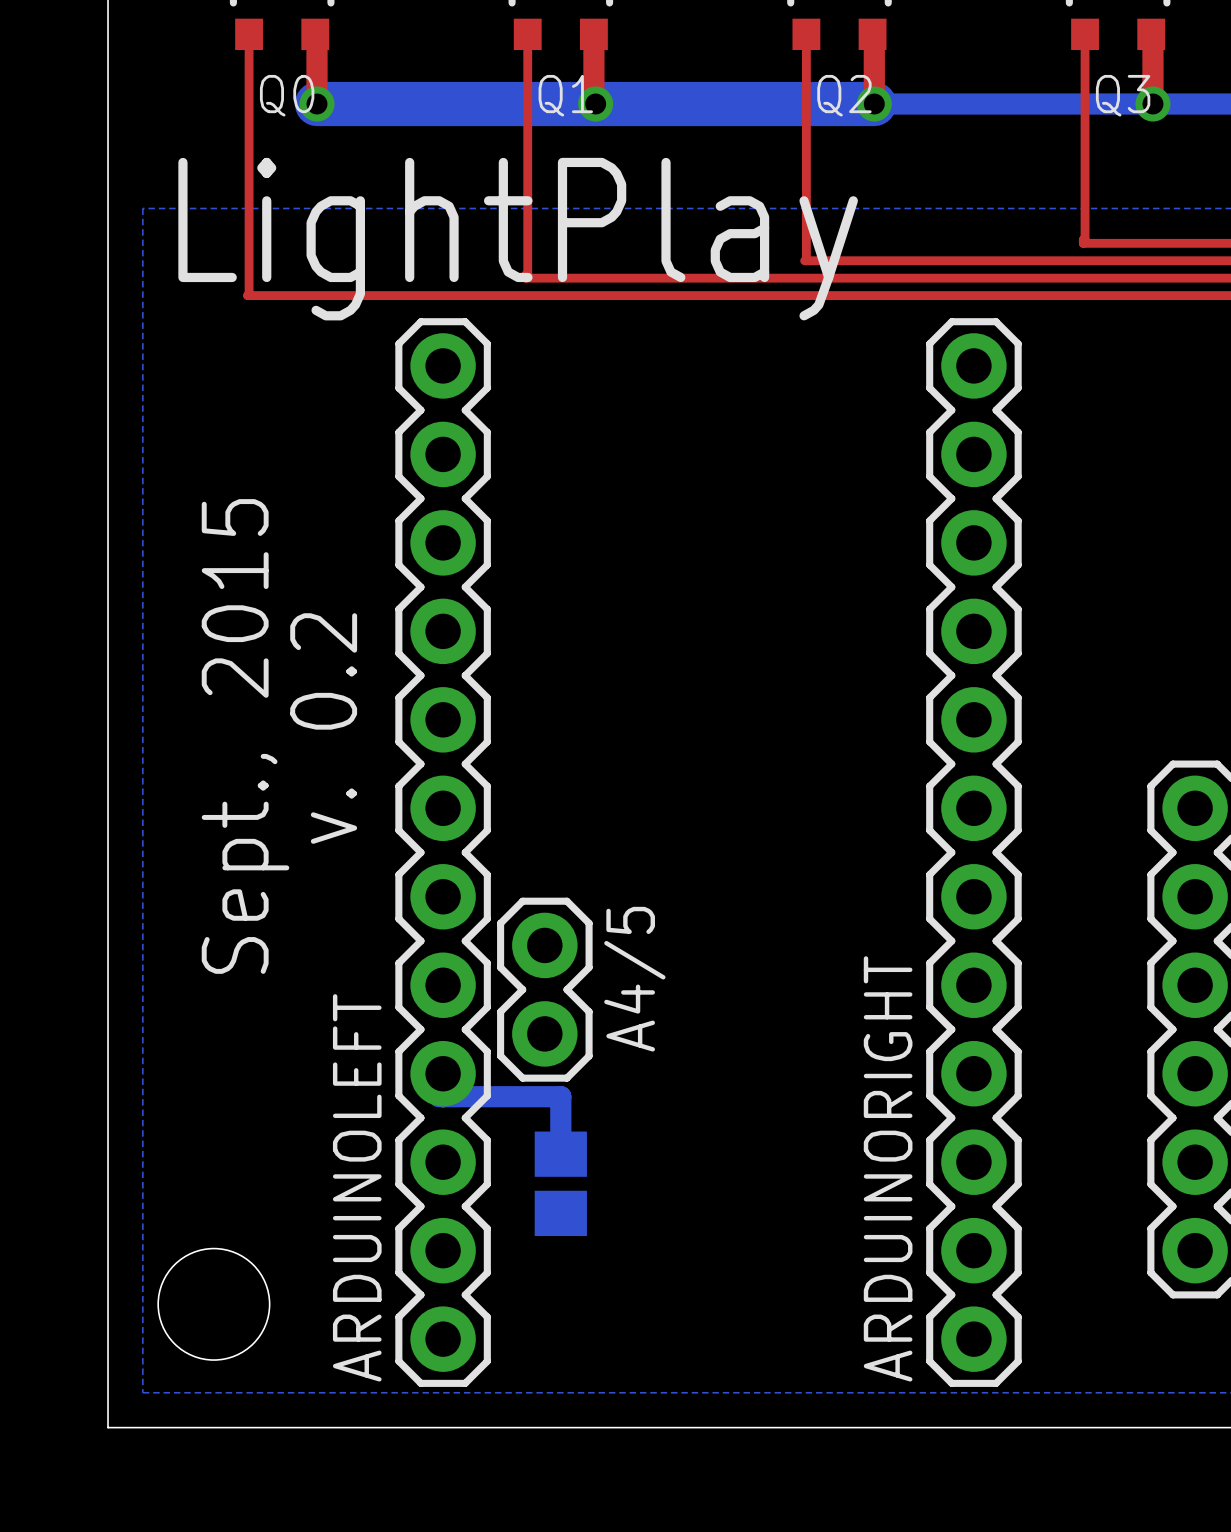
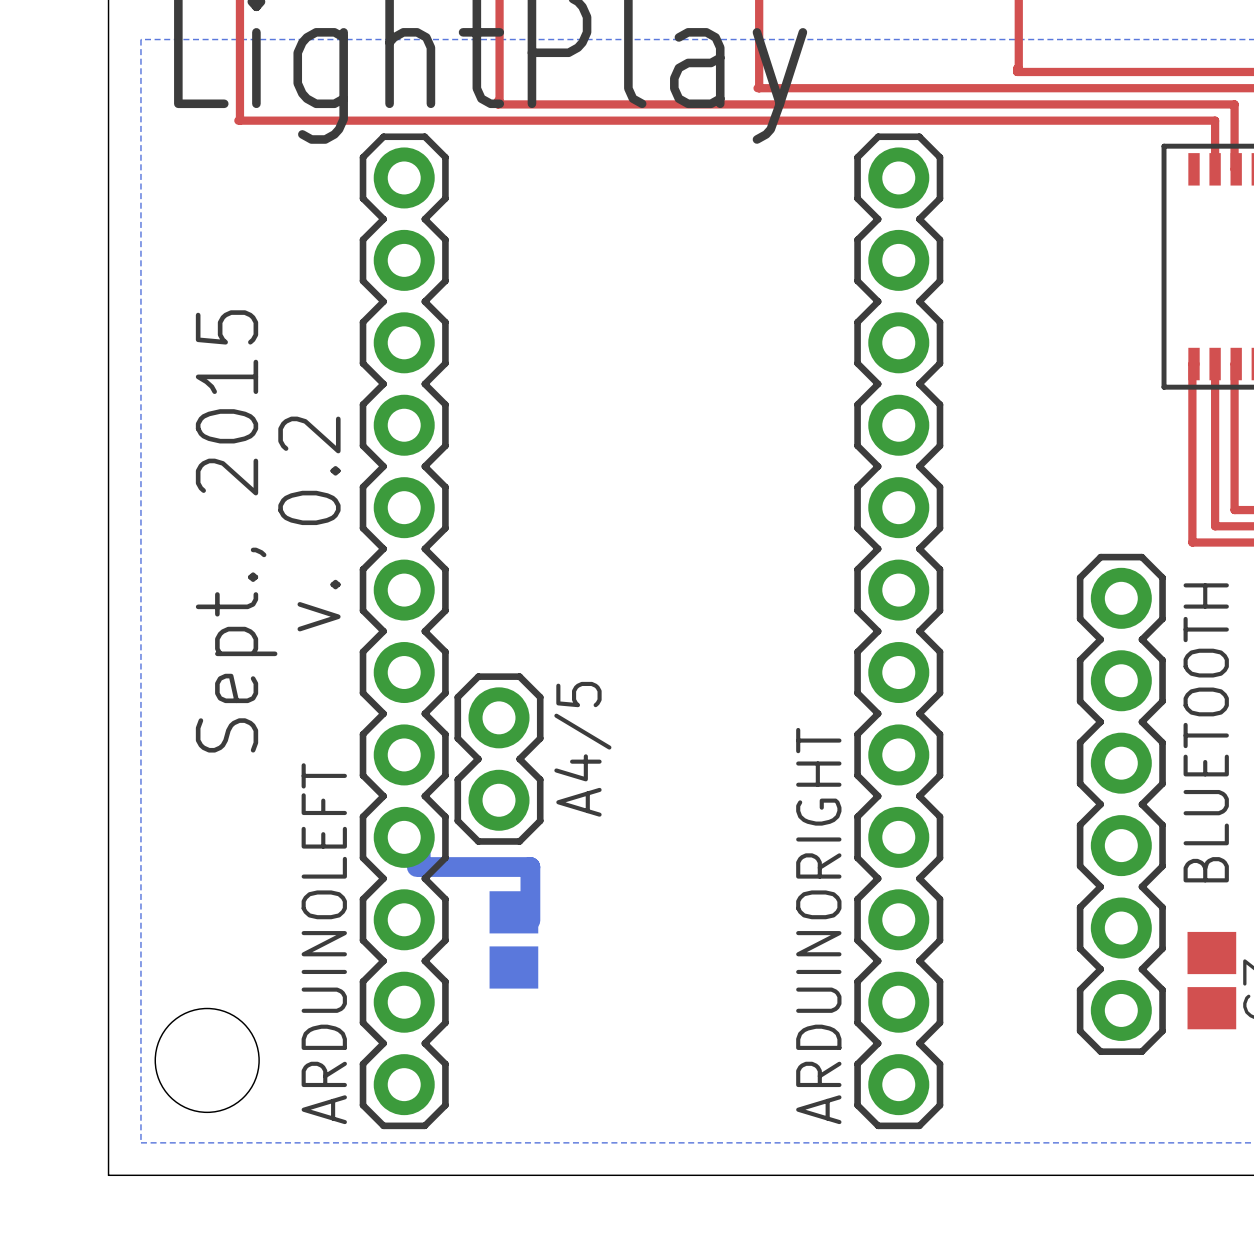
ARDUINOLEFT position: (443, 852) -> (404, 631)
ARDUINORIGHT position: (973, 852) -> (898, 631)
A4/5 position: (544, 989) -> (499, 759)
part position: (560, 1183) -> (513, 939)

